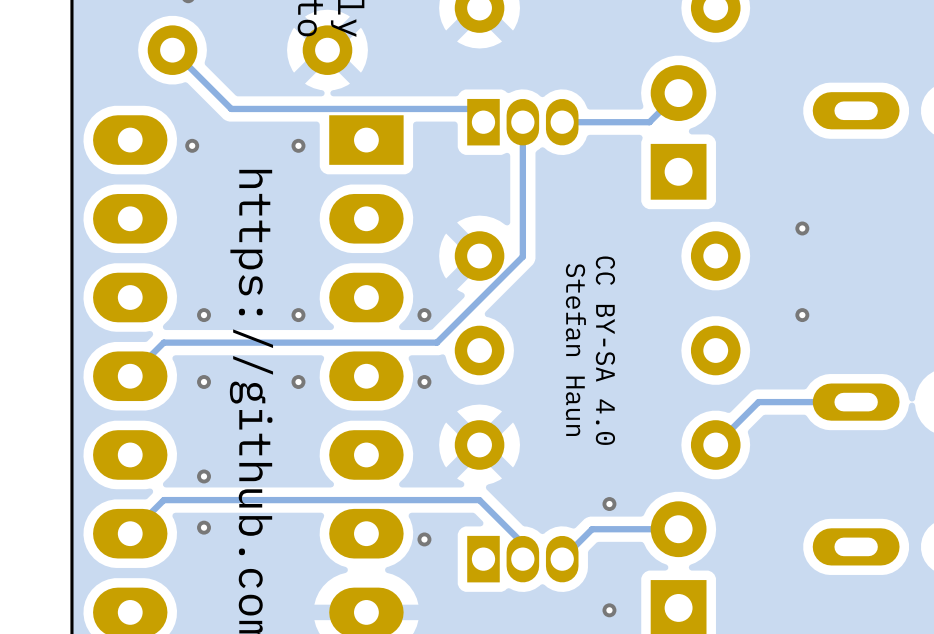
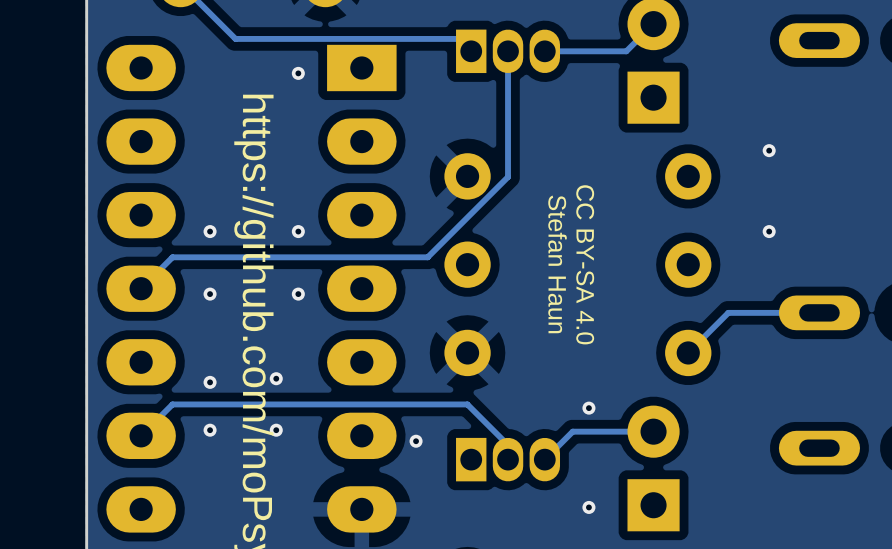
via: (192, 145) -> none
via: (424, 315) -> none
via: (424, 382) -> none
via: none -> (276, 378)
via: none -> (276, 430)

